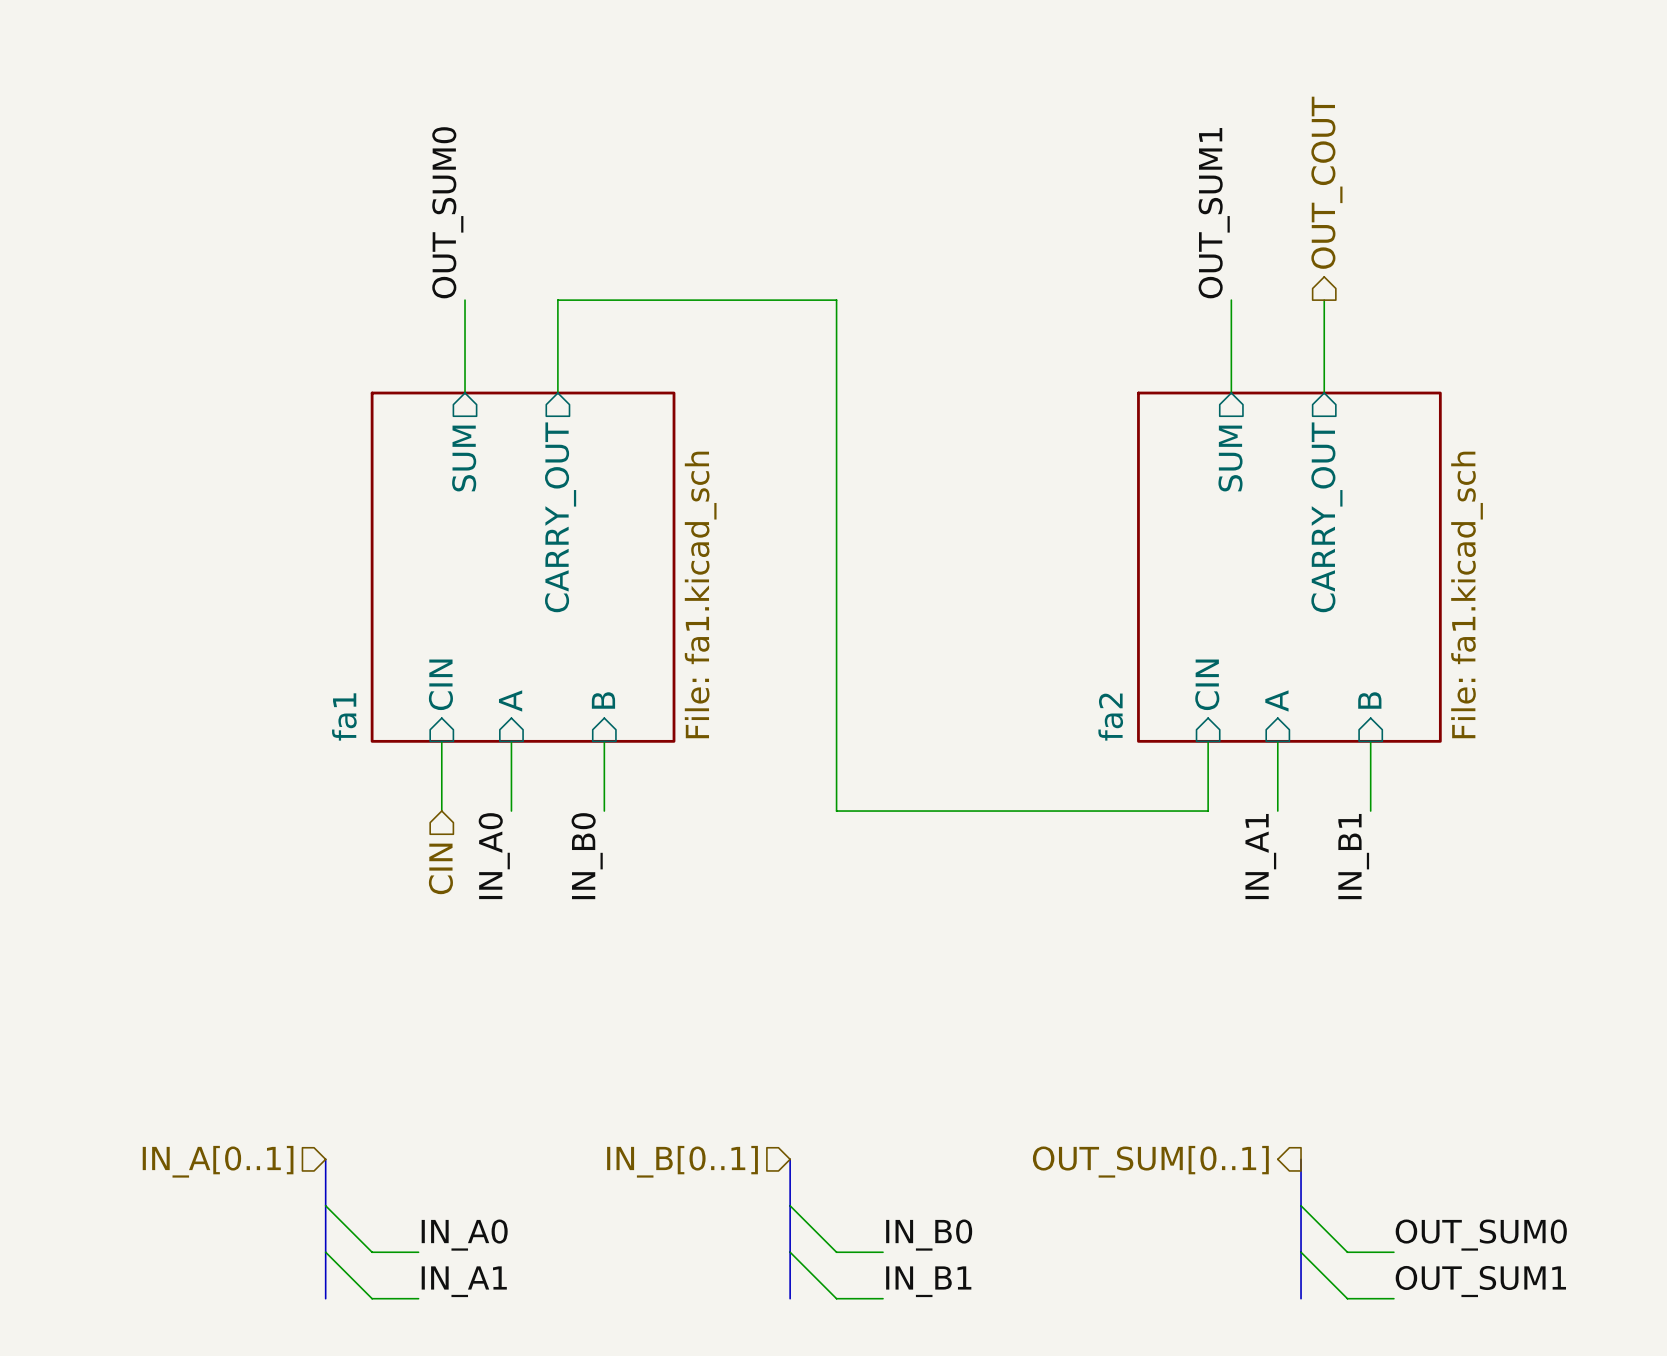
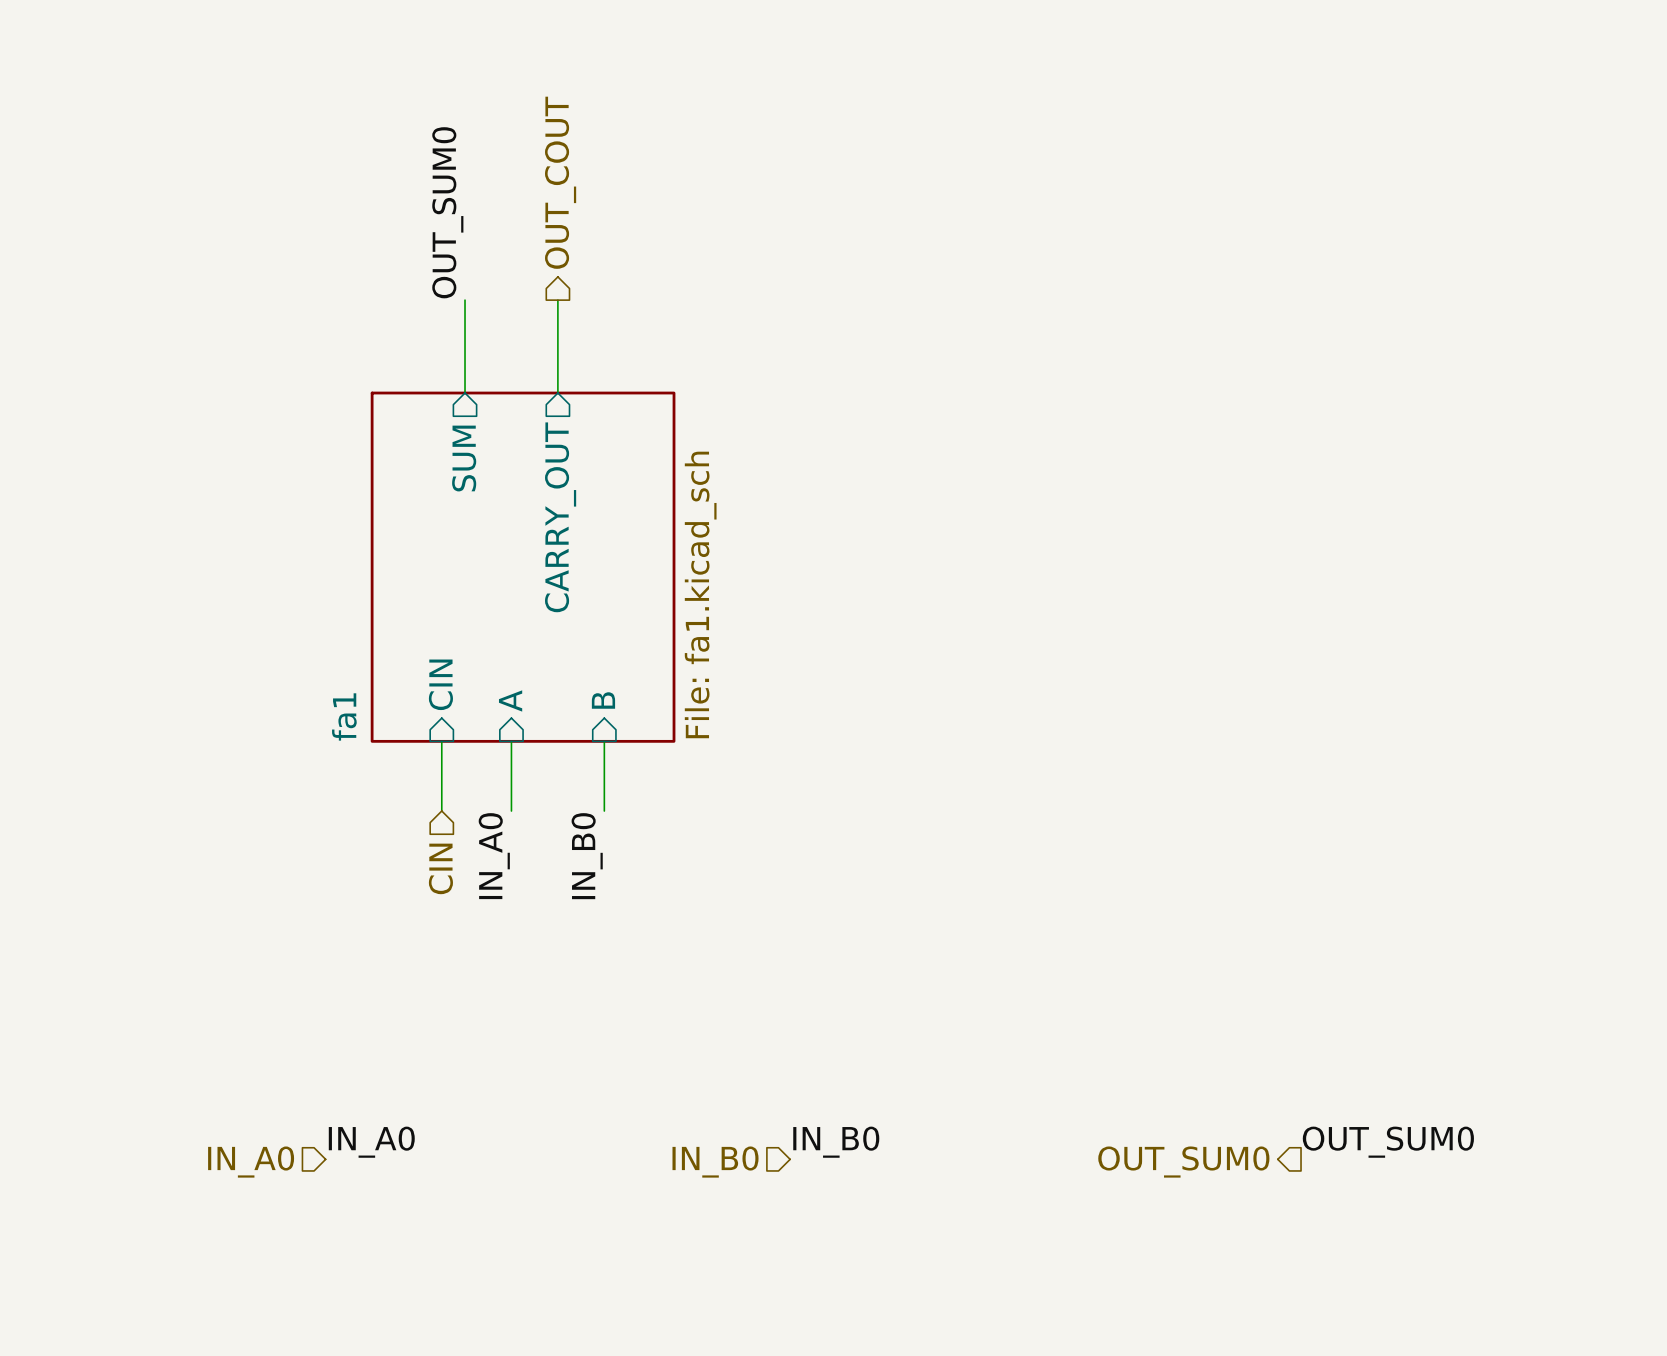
hierarchical label: none -> OUT_COUT (560, 182)
hierarchical label: OUT_COUT (1326, 182) -> none
label: OUT_SUM1 (1214, 213) -> none
wire: (557, 300) (836, 300) (836, 811) (1208, 811) (1208, 741) -> none
wire: (1231, 300) (1231, 393) -> none
wire: (1324, 300) (1324, 393) -> none
sheet pin: SUM (1230, 458) -> none
sheet pin: CARRY_OUT (1326, 517) -> none
sheet fa2: File: fa1.kicad_sch (1289, 567) -> none
sheet pin: CIN (1207, 684) -> none
sheet pin: A (1276, 700) -> none
sheet pin: B (1369, 700) -> none
wire: (1277, 741) (1277, 811) -> none
wire: (1370, 741) (1370, 811) -> none
label: IN_A1 (1260, 856) -> none
label: IN_B1 (1353, 856) -> none
bus: (325, 1159) (325, 1298) -> none
bus: (790, 1159) (790, 1298) -> none
bus: (1301, 1159) (1301, 1298) -> none
hierarchical label: IN_A[0..1] (218, 1161) -> IN_A0 (251, 1162)
hierarchical label: IN_B[0..1] (682, 1161) -> IN_B0 (715, 1162)
hierarchical label: OUT_SUM[0..1] (1150, 1161) -> OUT_SUM0 (1183, 1162)
wire: (325, 1205) (372, 1252) (418, 1252) -> none
wire: (790, 1205) (836, 1252) (883, 1252) -> none
wire: (1301, 1205) (1347, 1252) (1393, 1252) -> none
label position: IN_A0 (464, 1235) -> IN_A0 (371, 1142)
label position: IN_B0 (929, 1235) -> IN_B0 (836, 1142)
label position: OUT_SUM0 (1481, 1235) -> OUT_SUM0 (1388, 1142)
wire: (325, 1252) (372, 1298) (418, 1298) -> none
wire: (790, 1252) (836, 1298) (883, 1298) -> none
wire: (1301, 1252) (1347, 1298) (1393, 1298) -> none
label: IN_A1 (464, 1281) -> none
label: IN_B1 (928, 1281) -> none
label: OUT_SUM1 (1480, 1281) -> none

